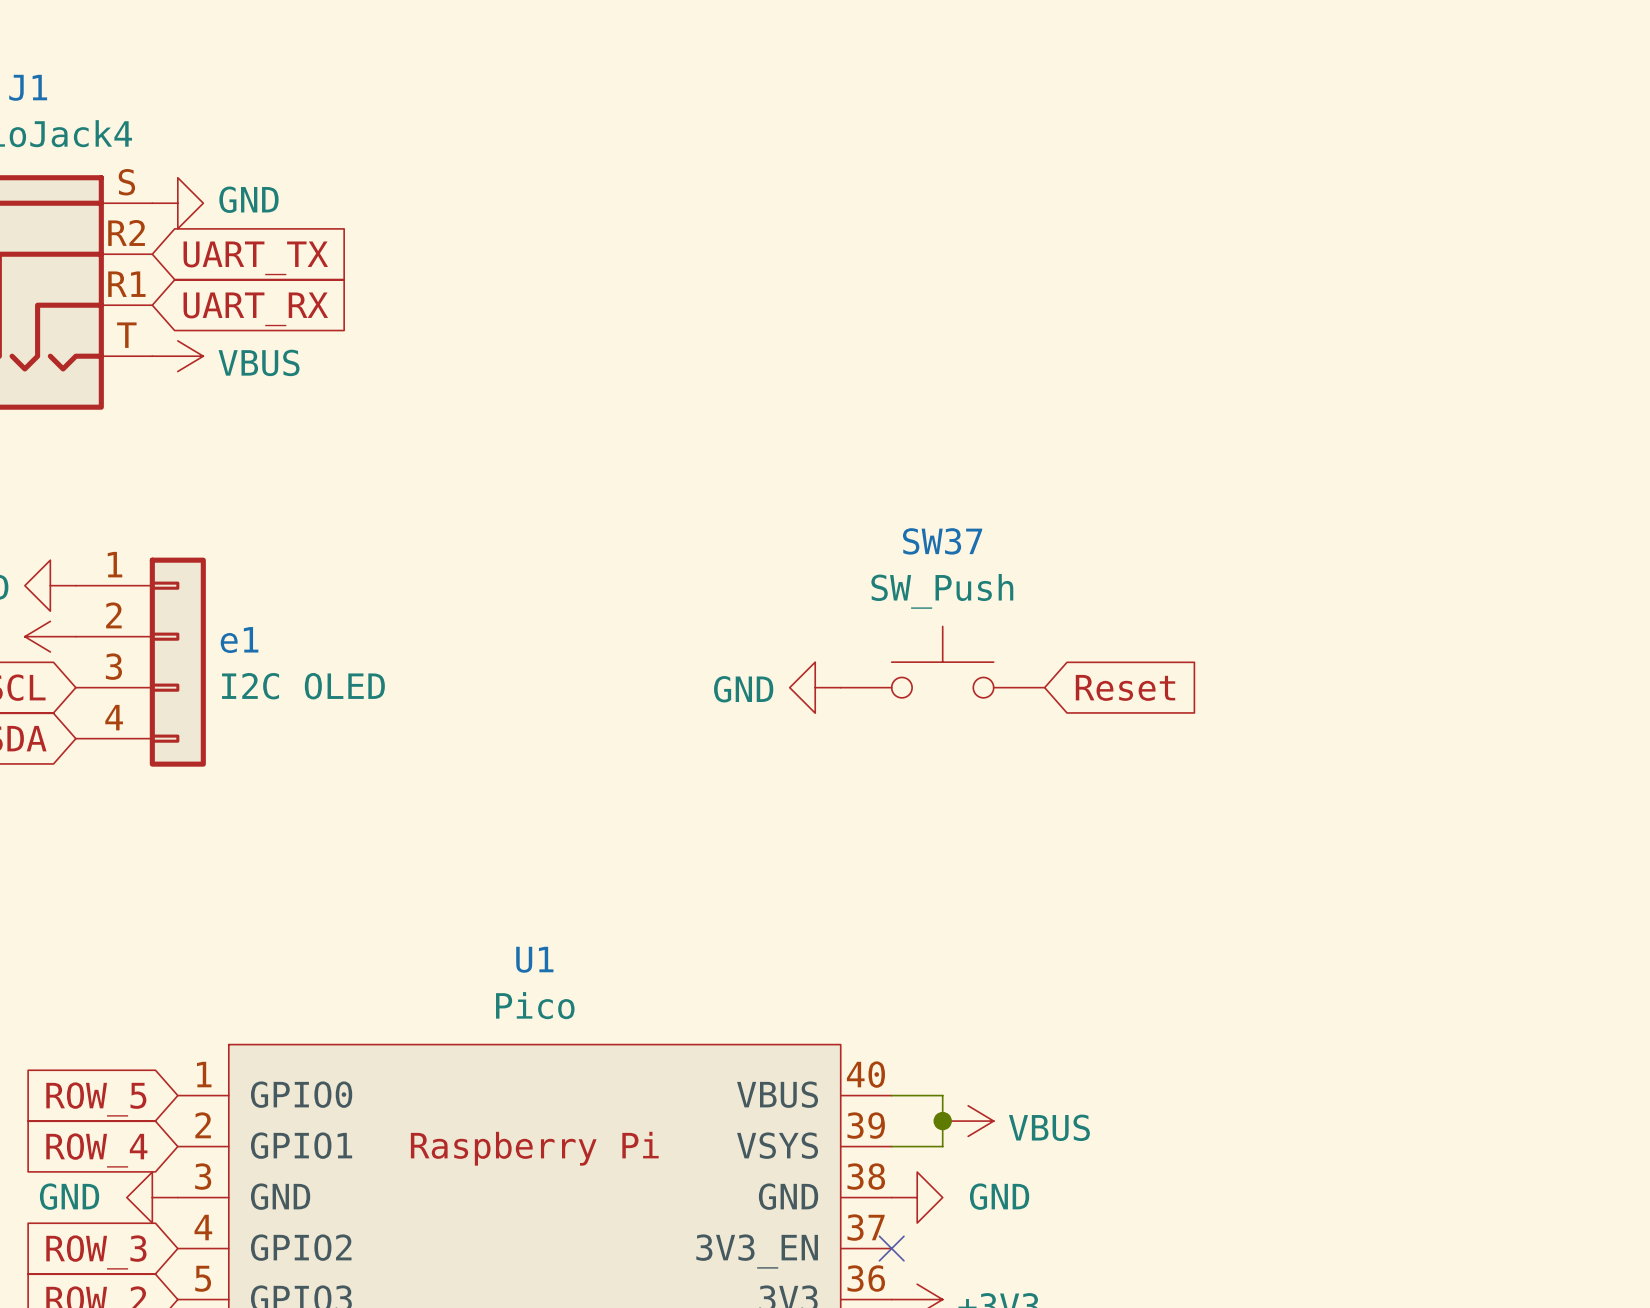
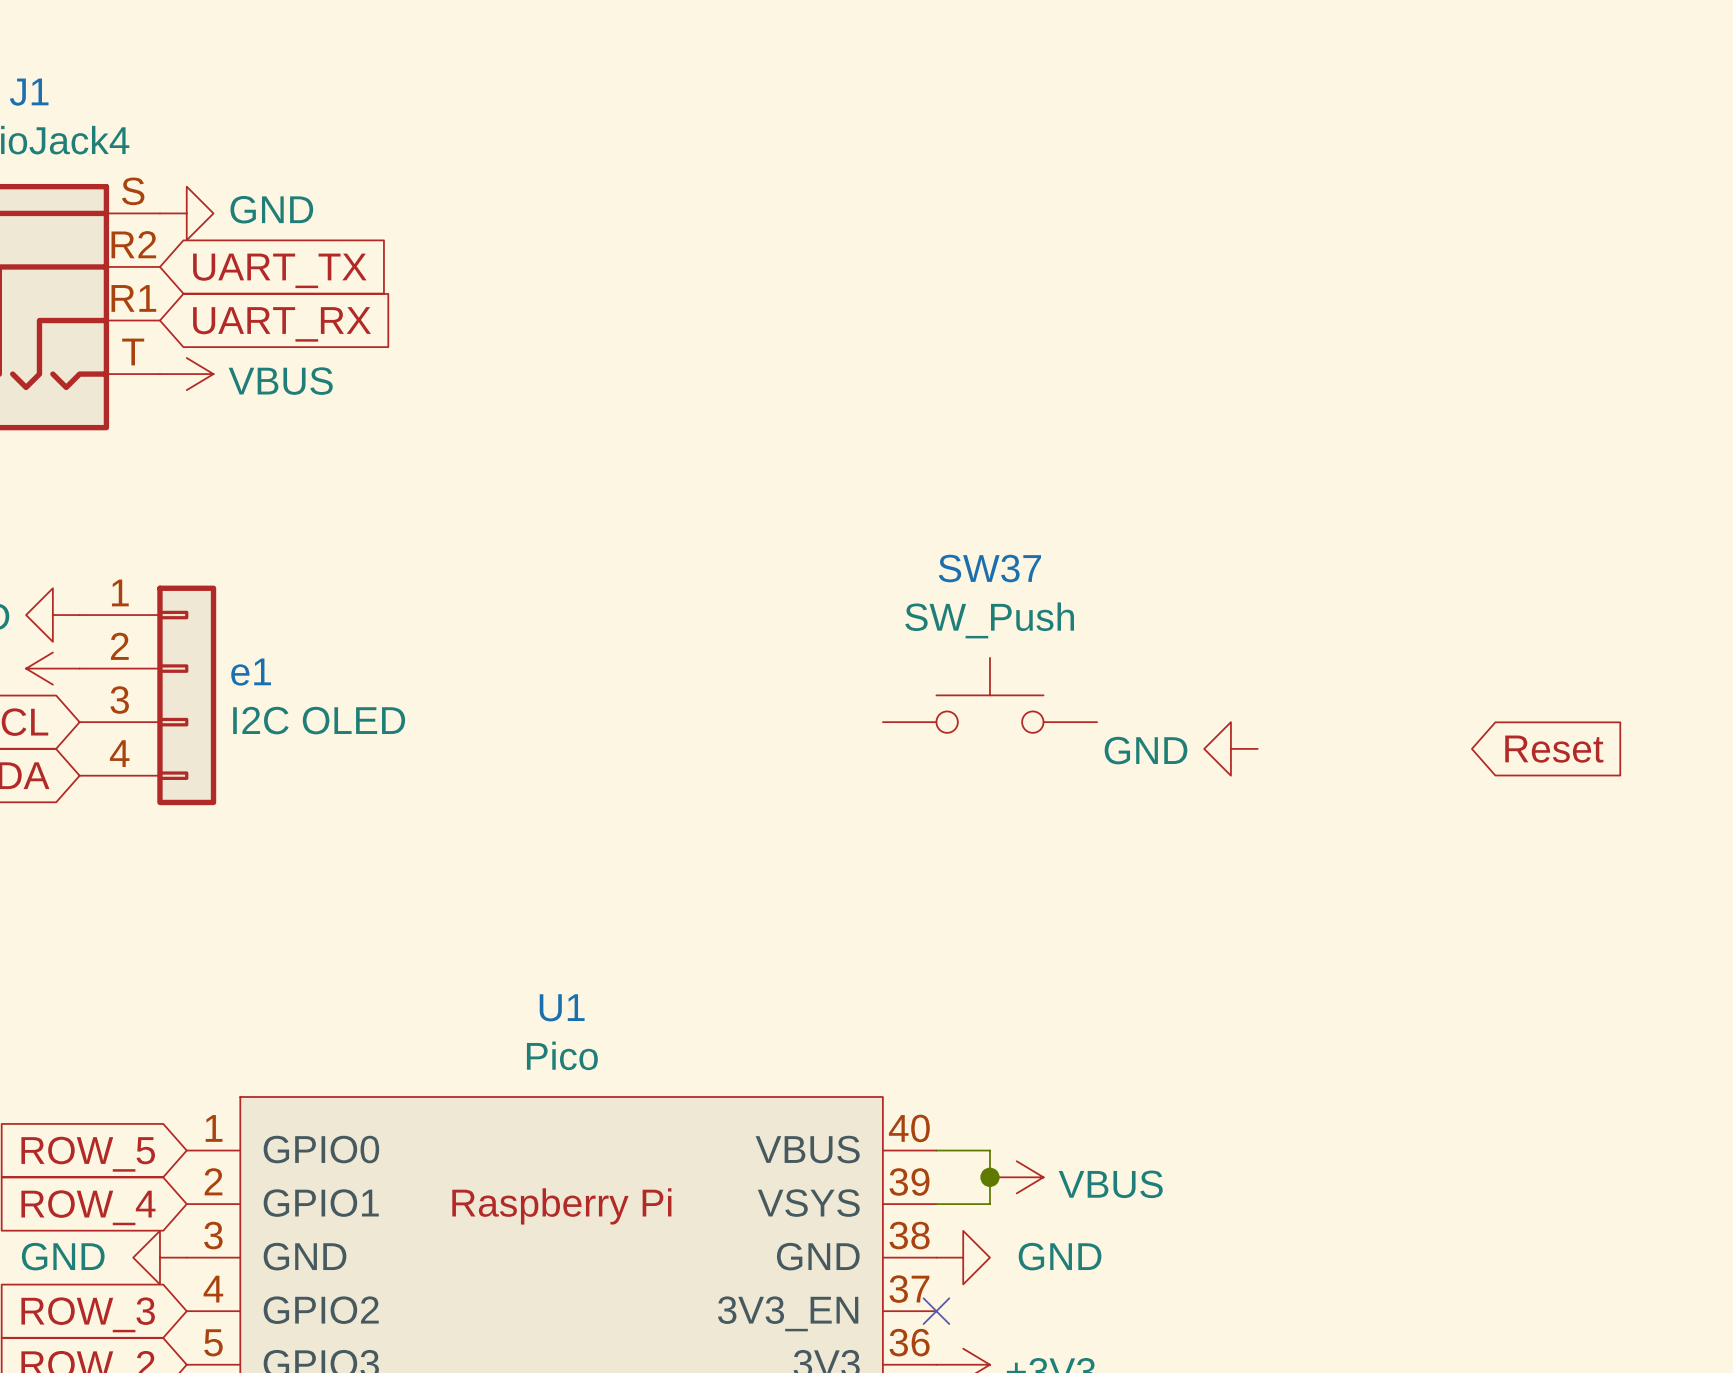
power symbol position: GND (815, 687) -> GND (1230, 748)
global label position: Reset (1125, 687) -> Reset (1554, 749)

